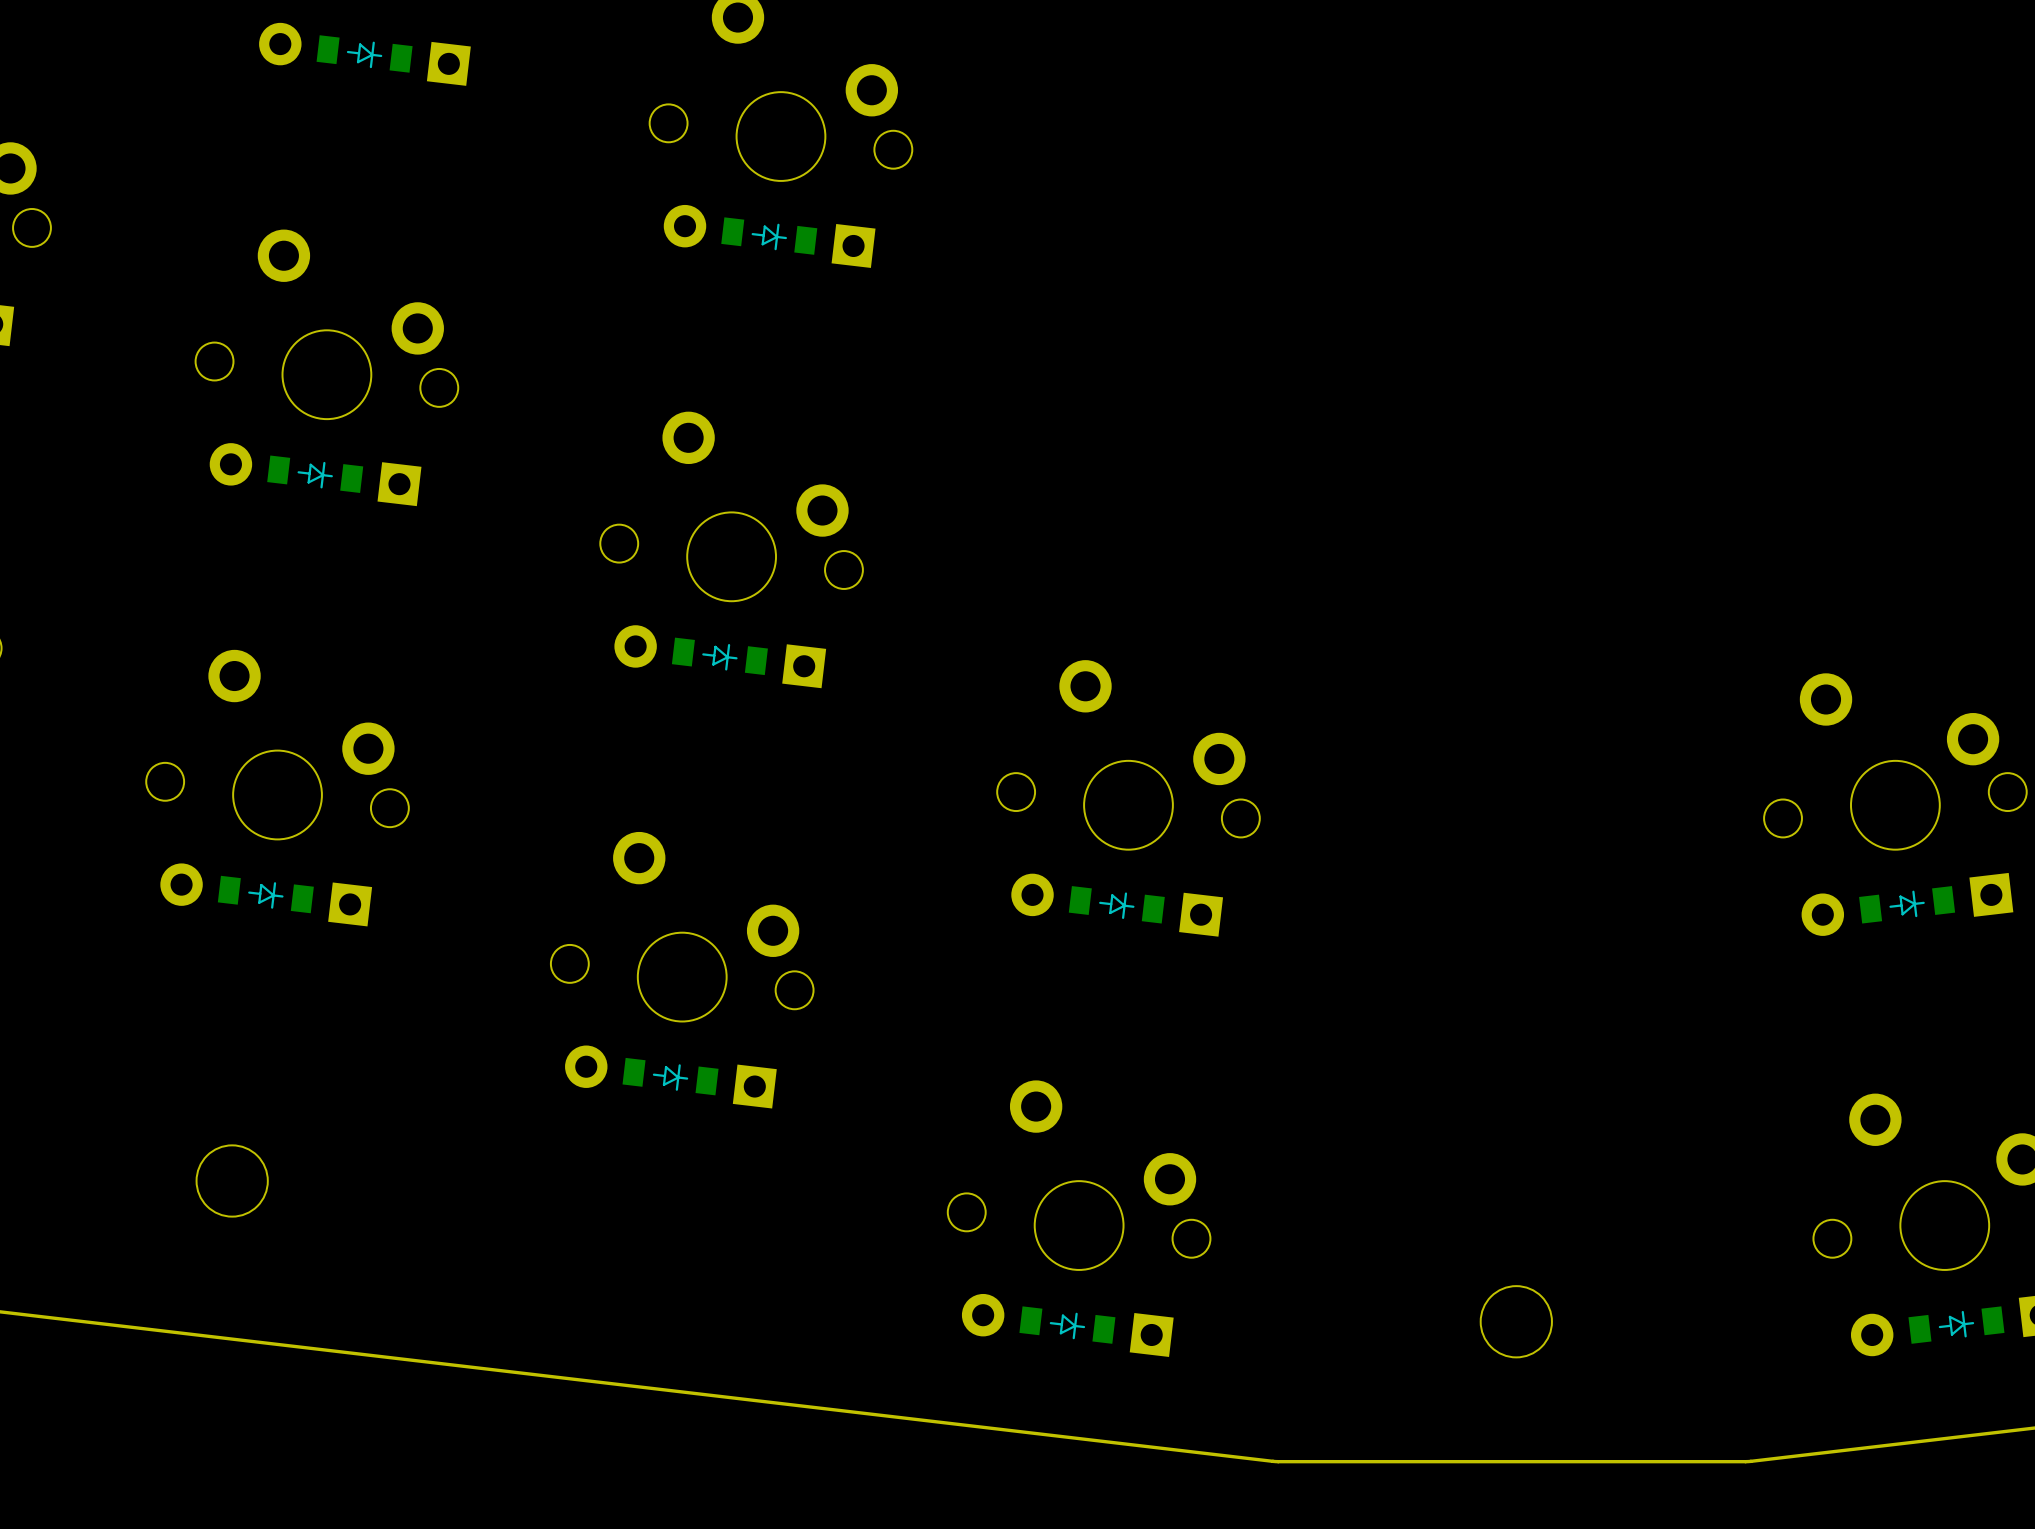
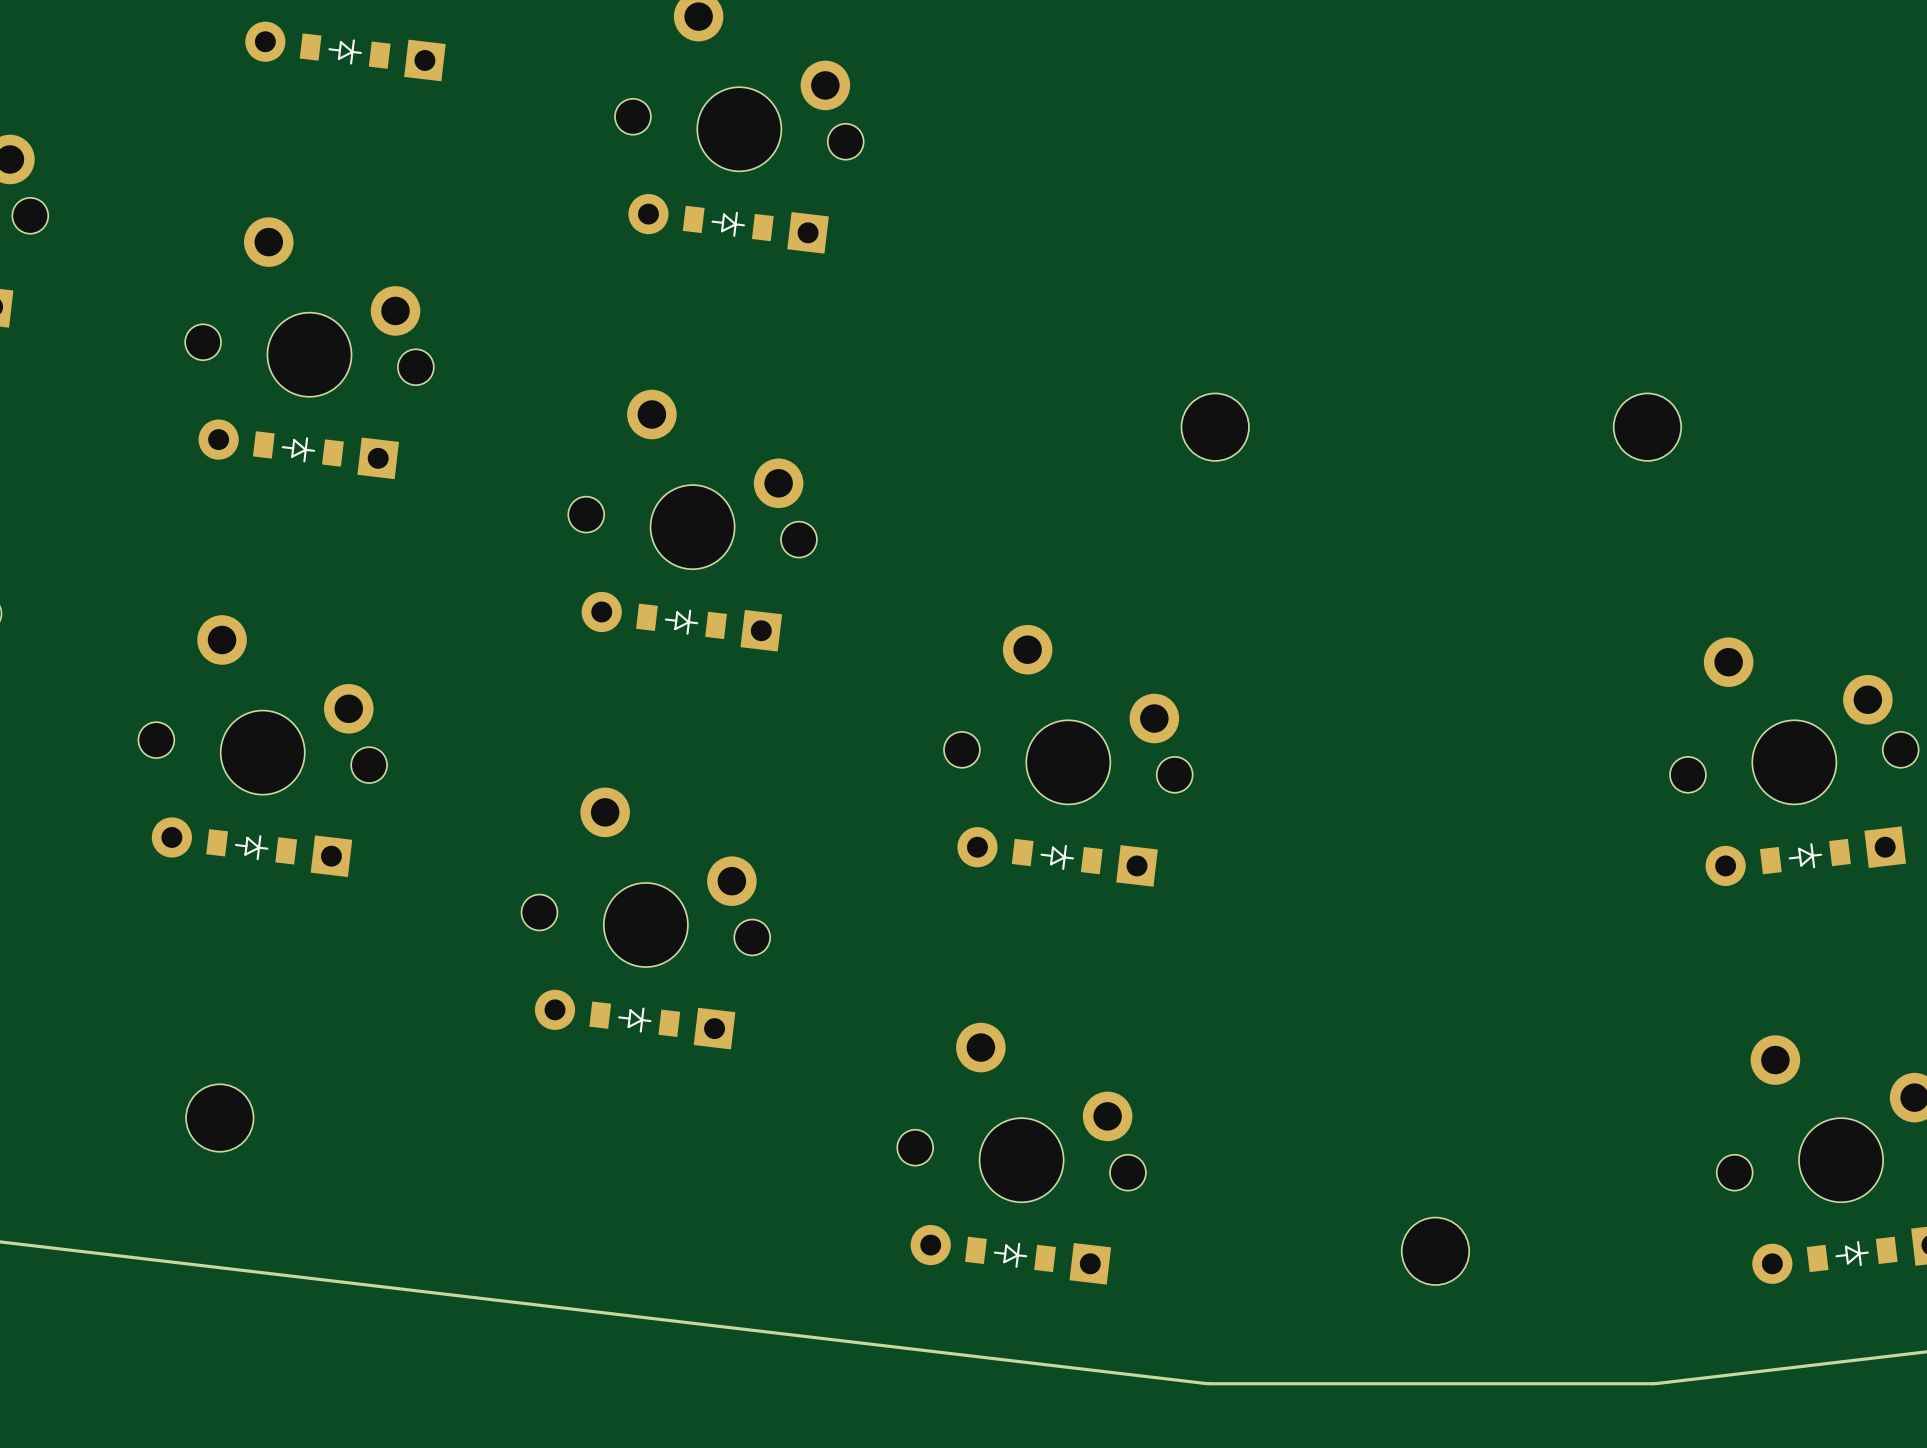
part: none -> (1215, 427)
part: none -> (1647, 427)

